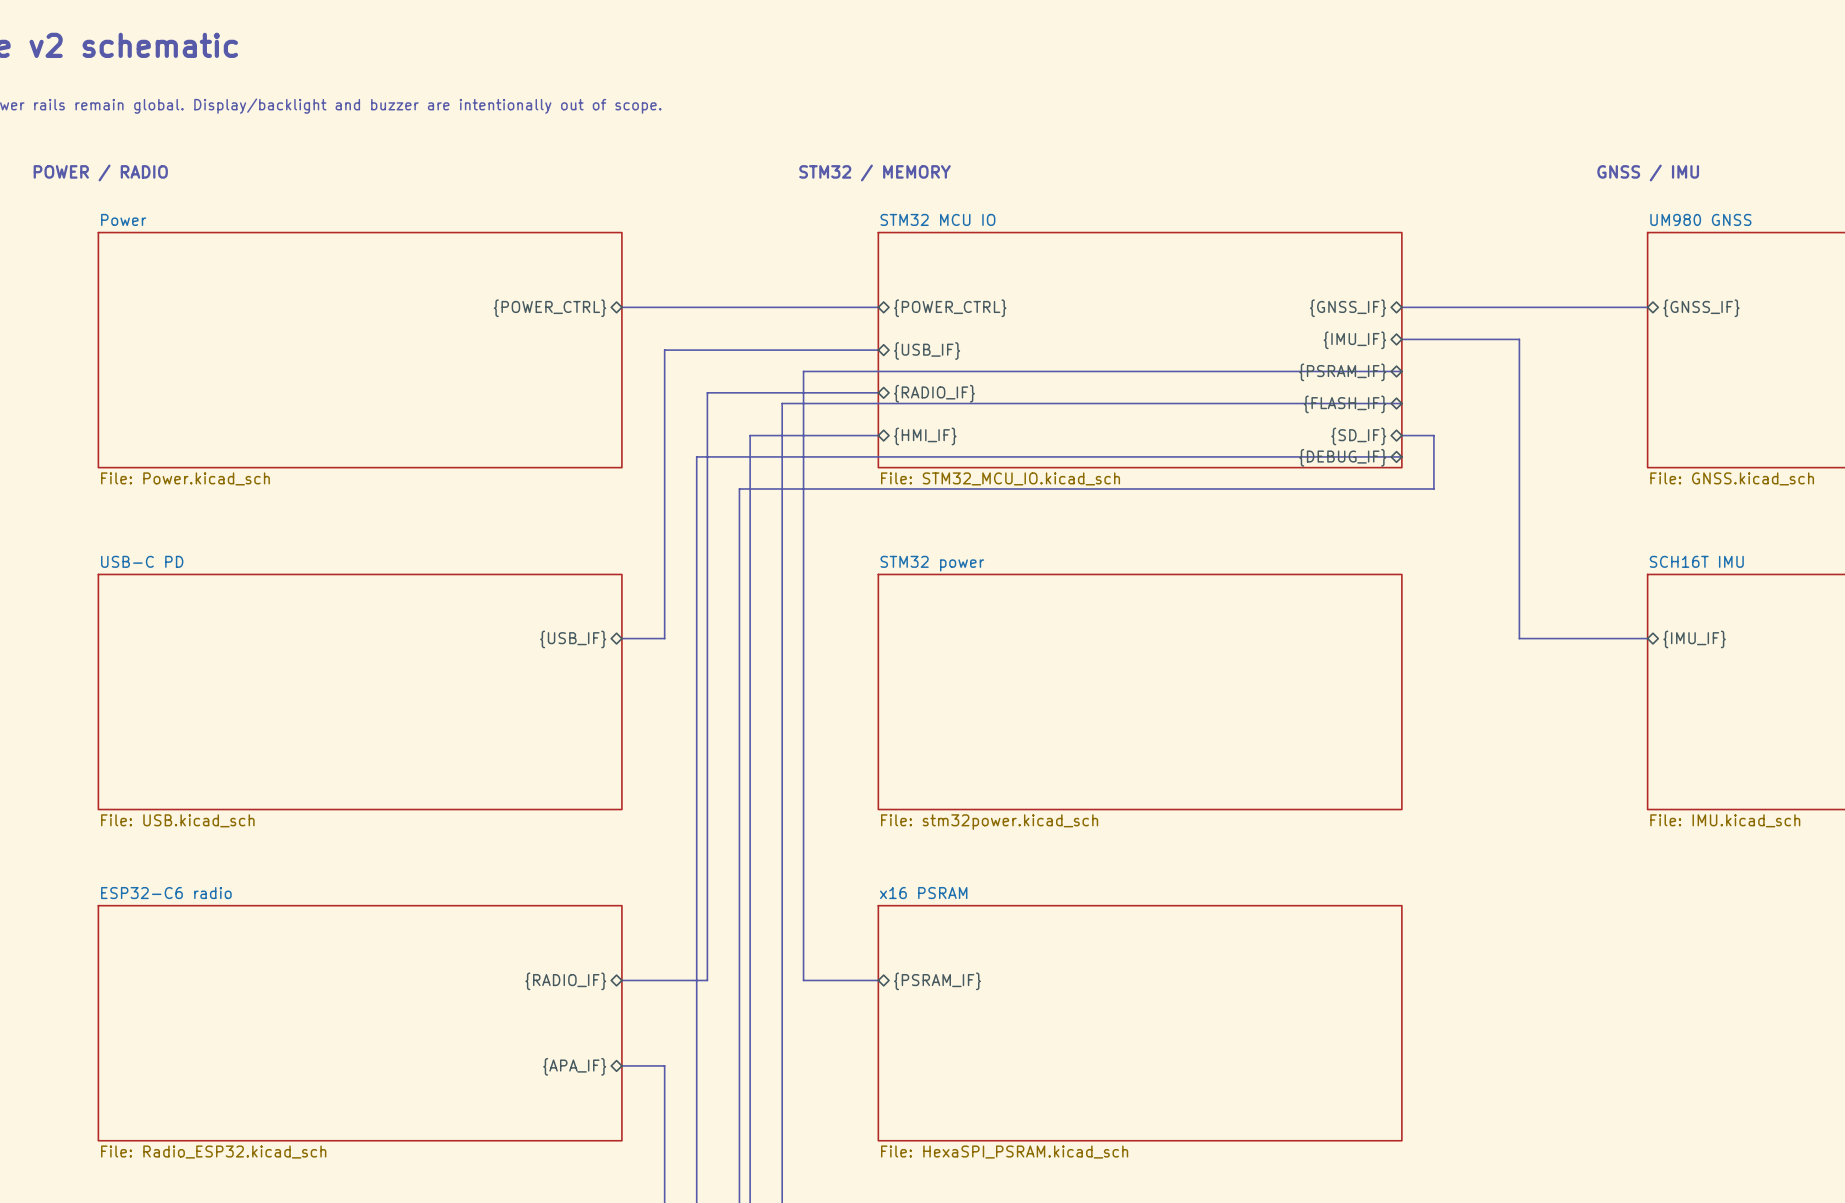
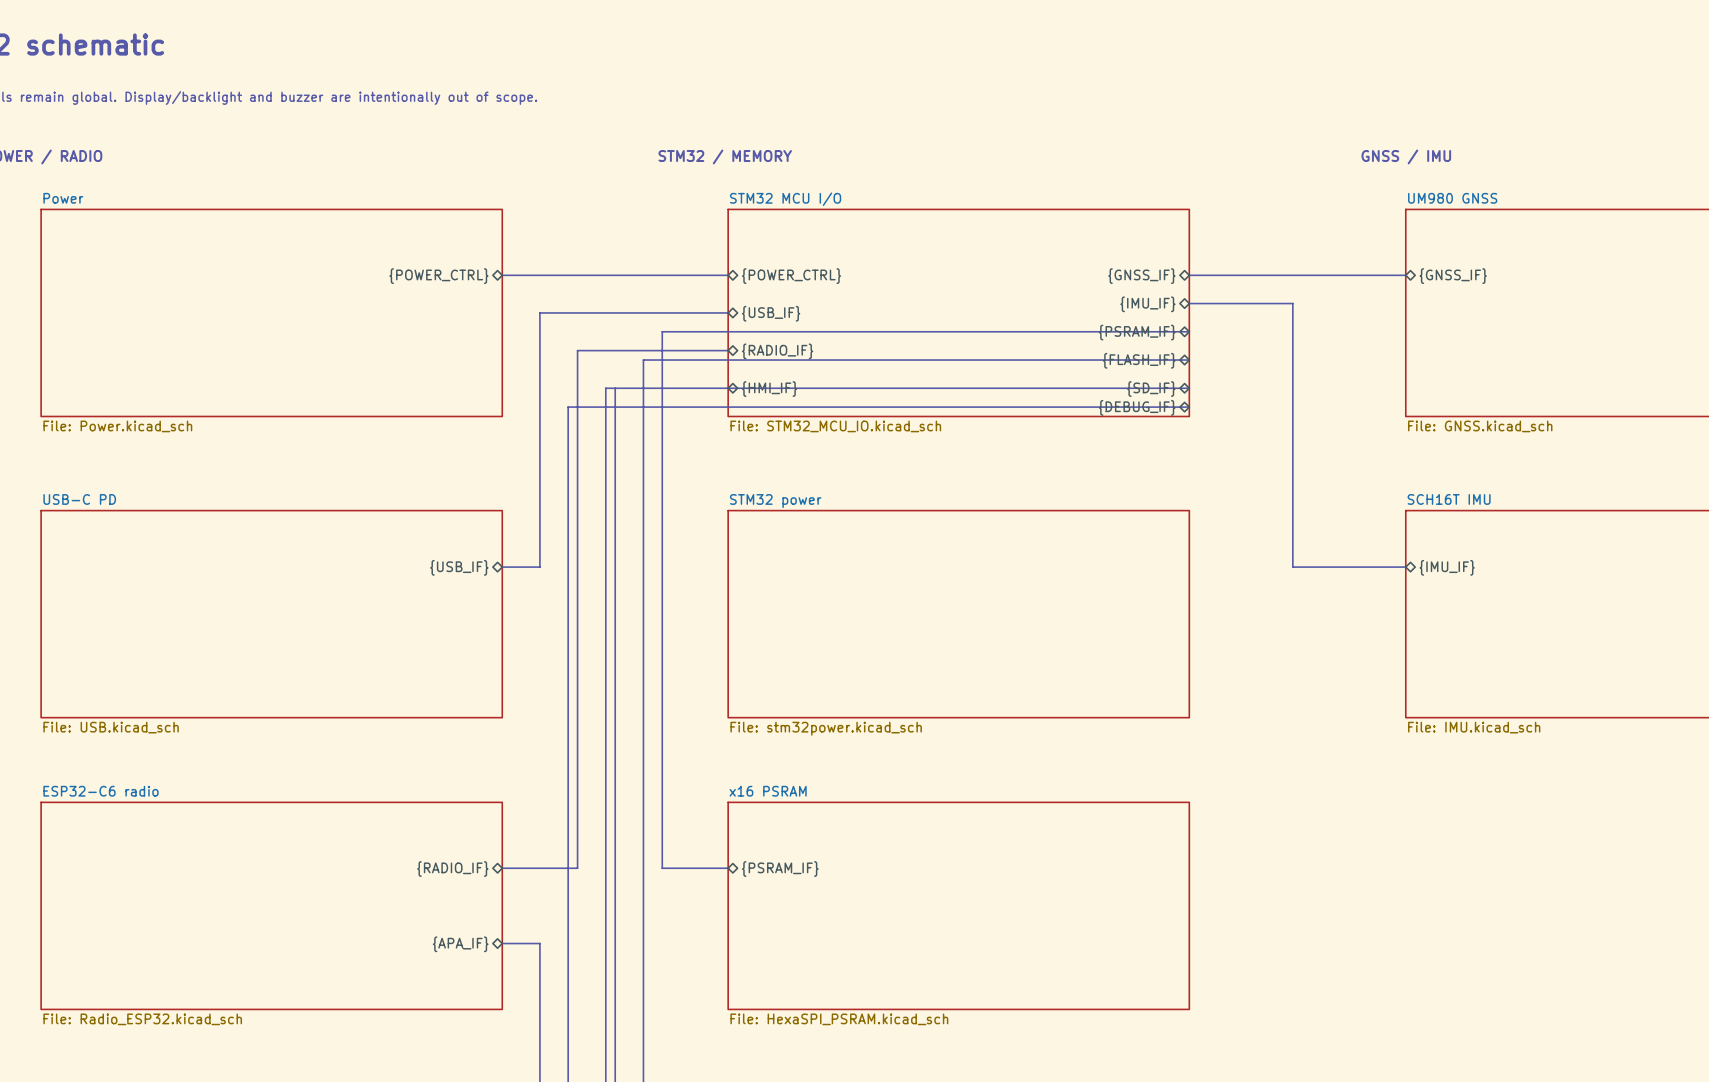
sheet STM32 MCU IO name: STM32 MCU IO (937, 219) -> STM32 MCU I/O (785, 199)
bus: none -> (615, 388) (605, 388) (605, 435)
bus: (1401, 435) (1433, 435) (1433, 488) (739, 488) -> (1189, 388) (728, 388)

